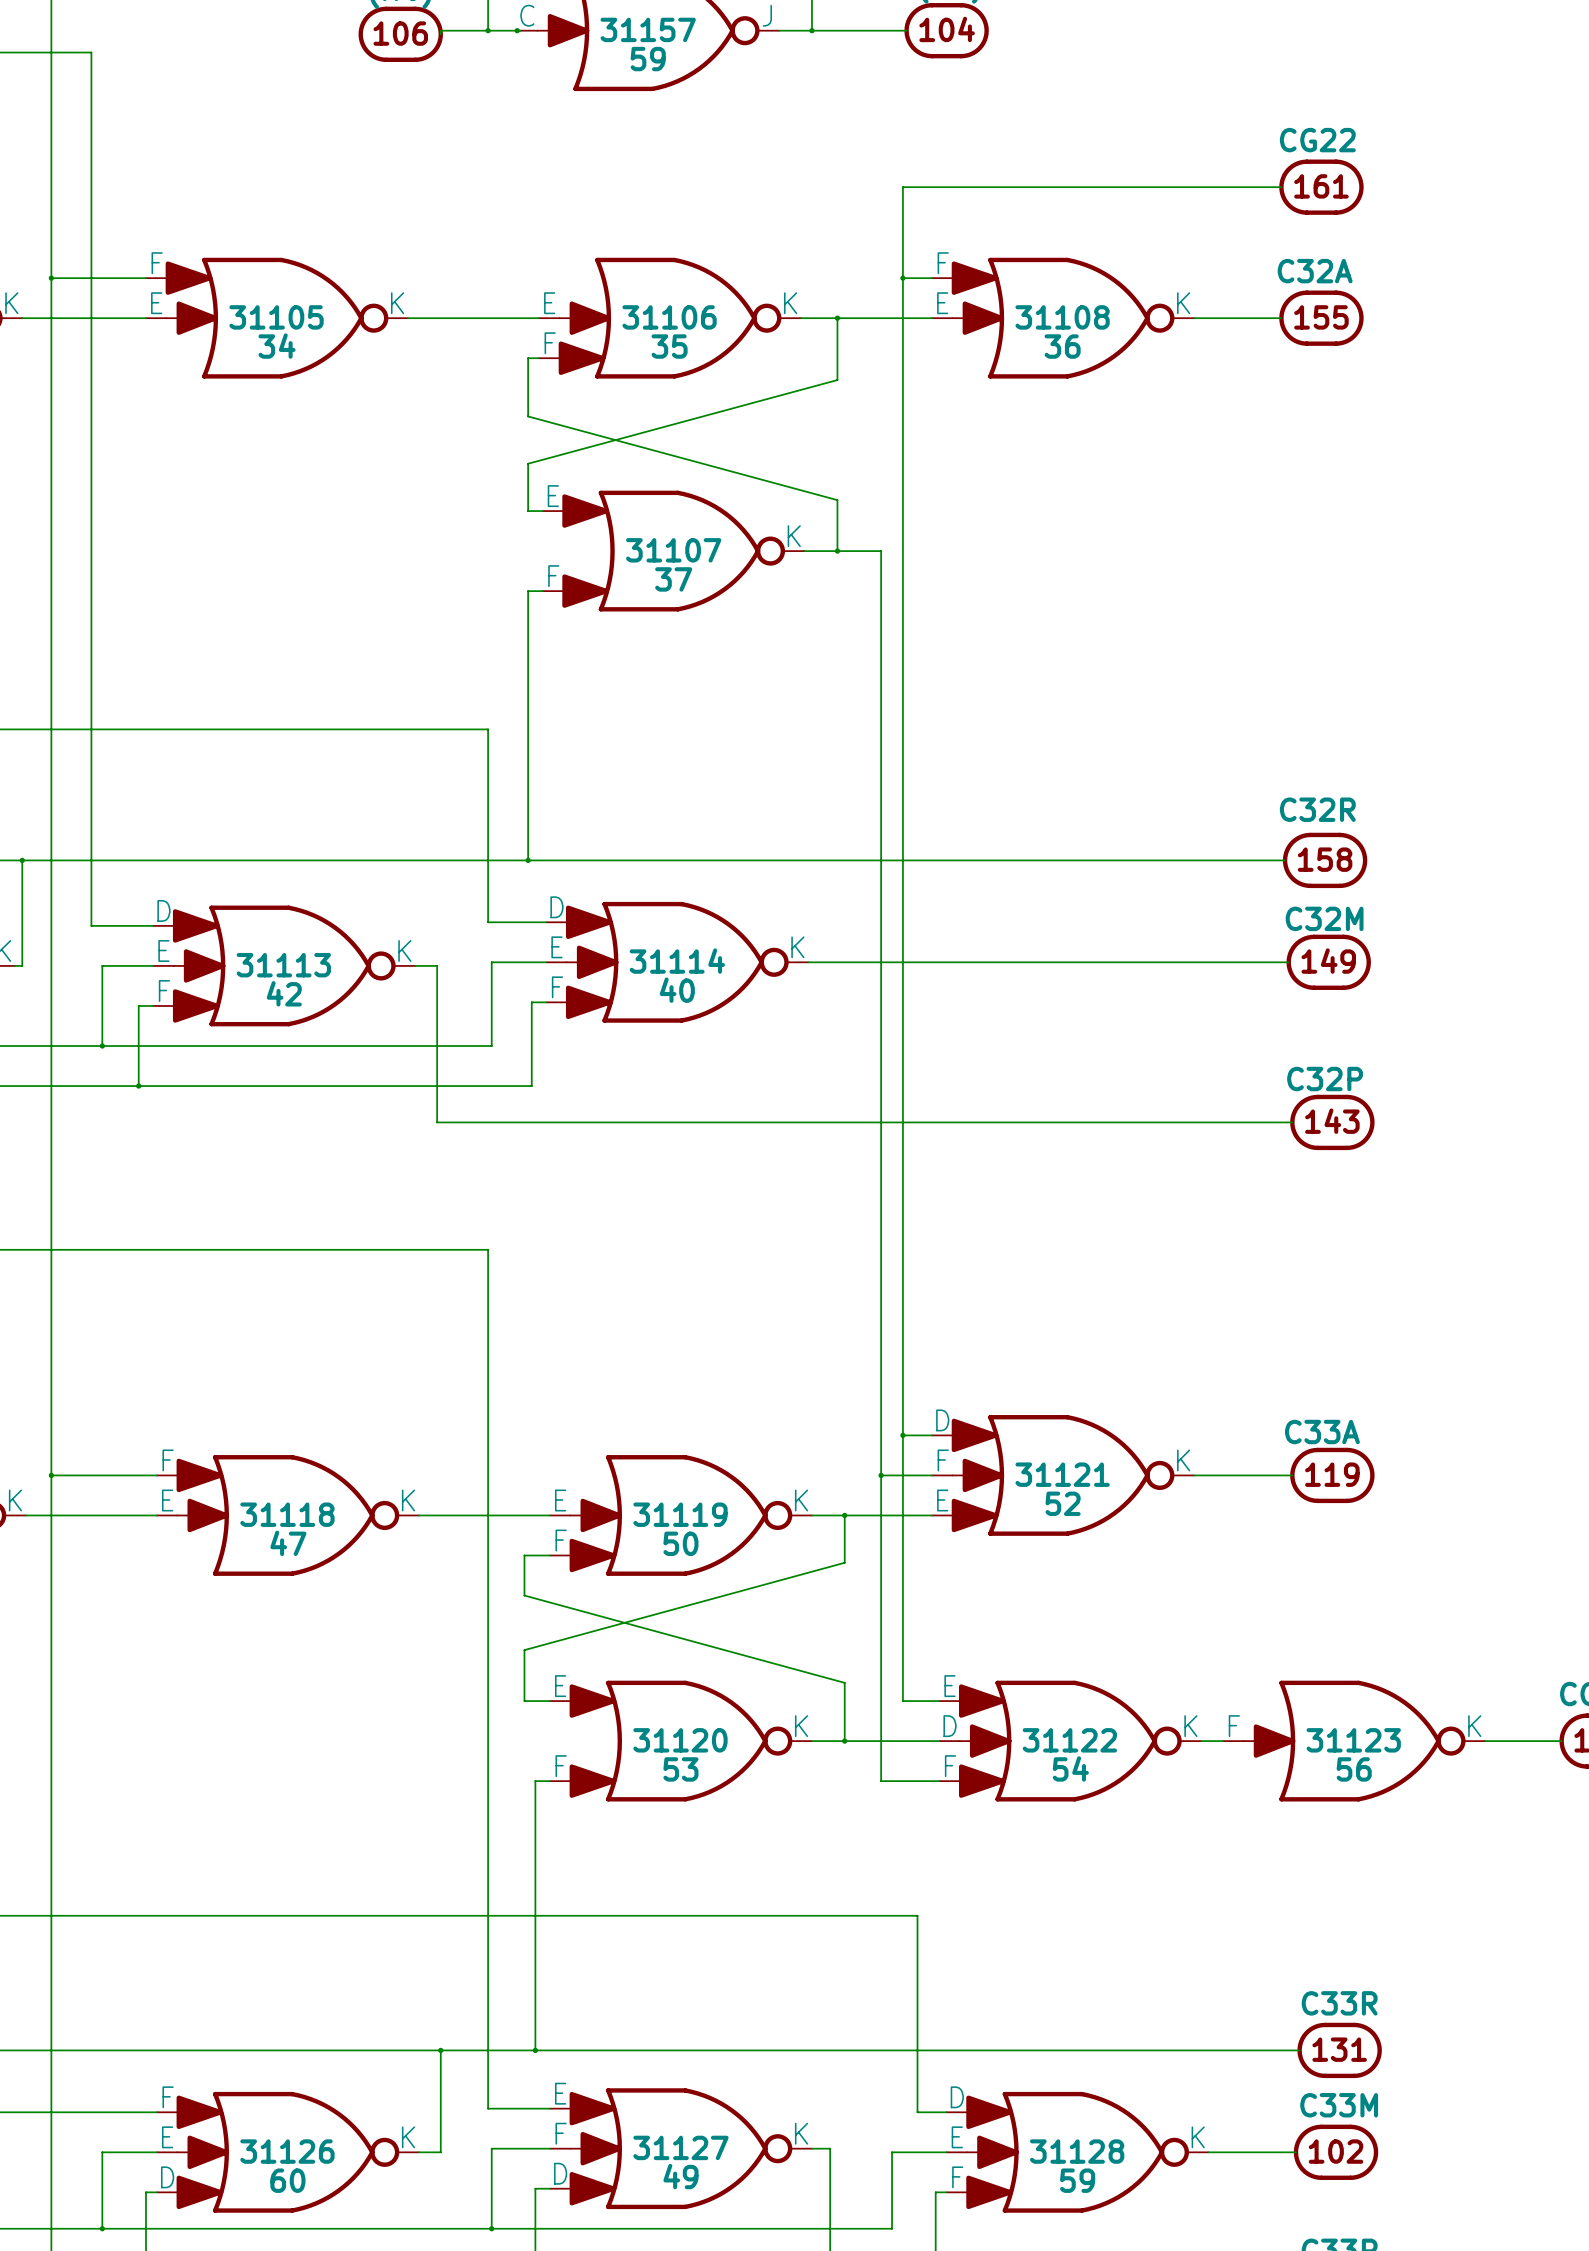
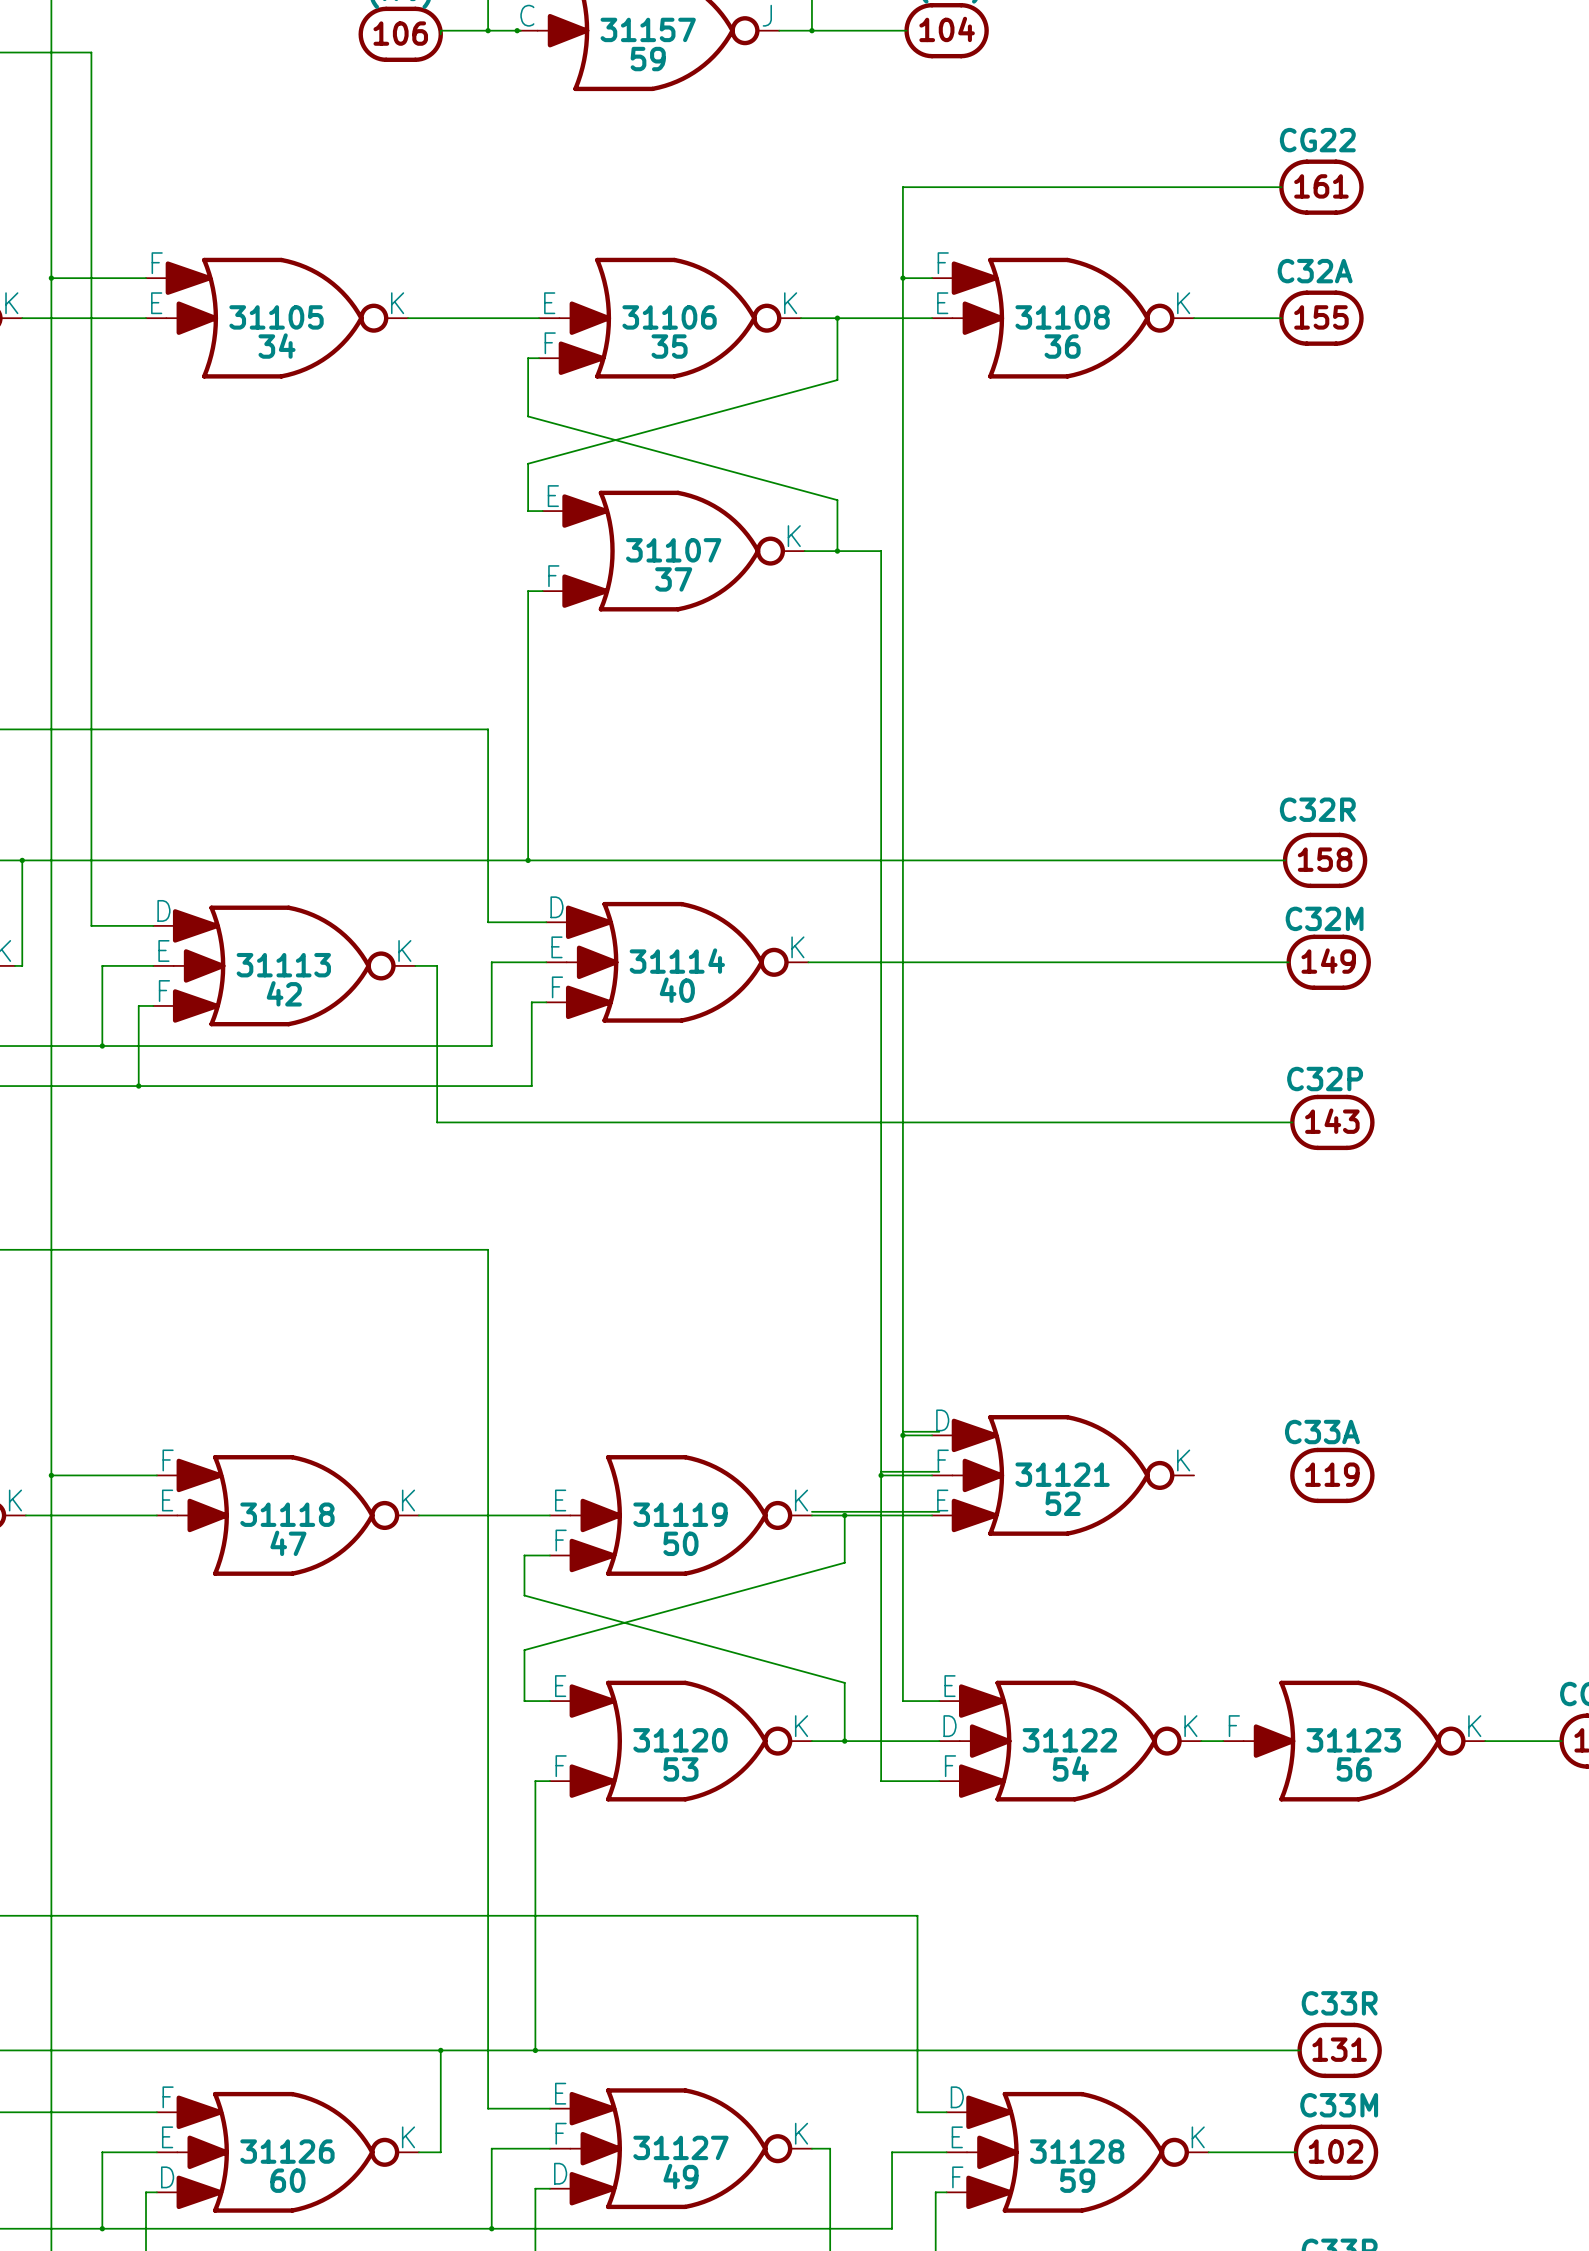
wire: none -> (902, 1431) (939, 1431)
wire: none -> (881, 1471) (939, 1471)
wire: (1194, 1475) (1292, 1475) -> none
wire: none -> (811, 1511) (939, 1511)

